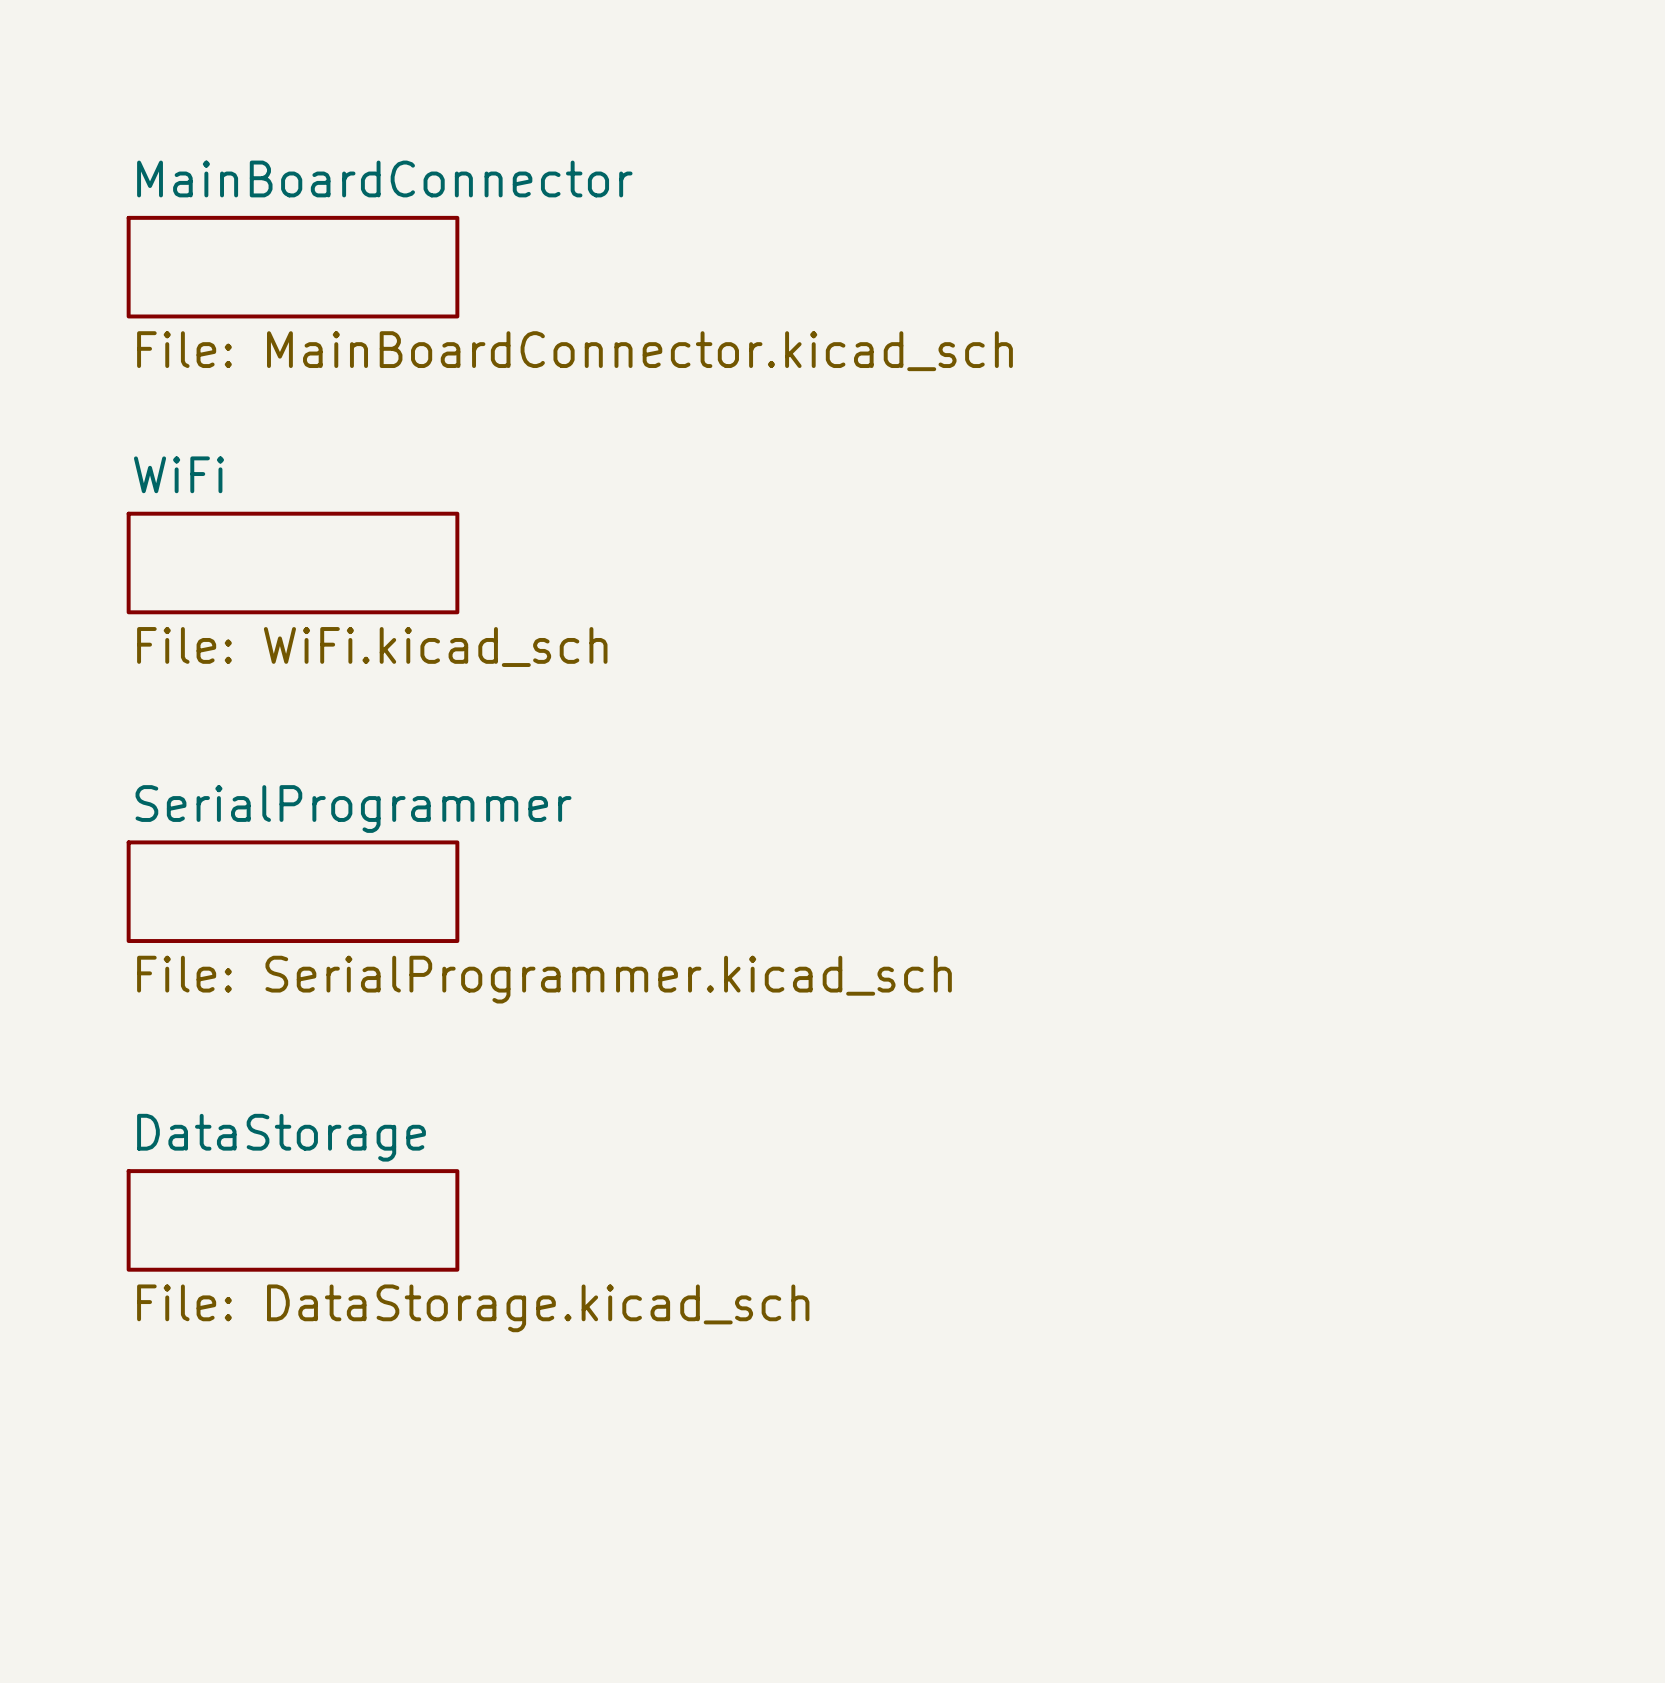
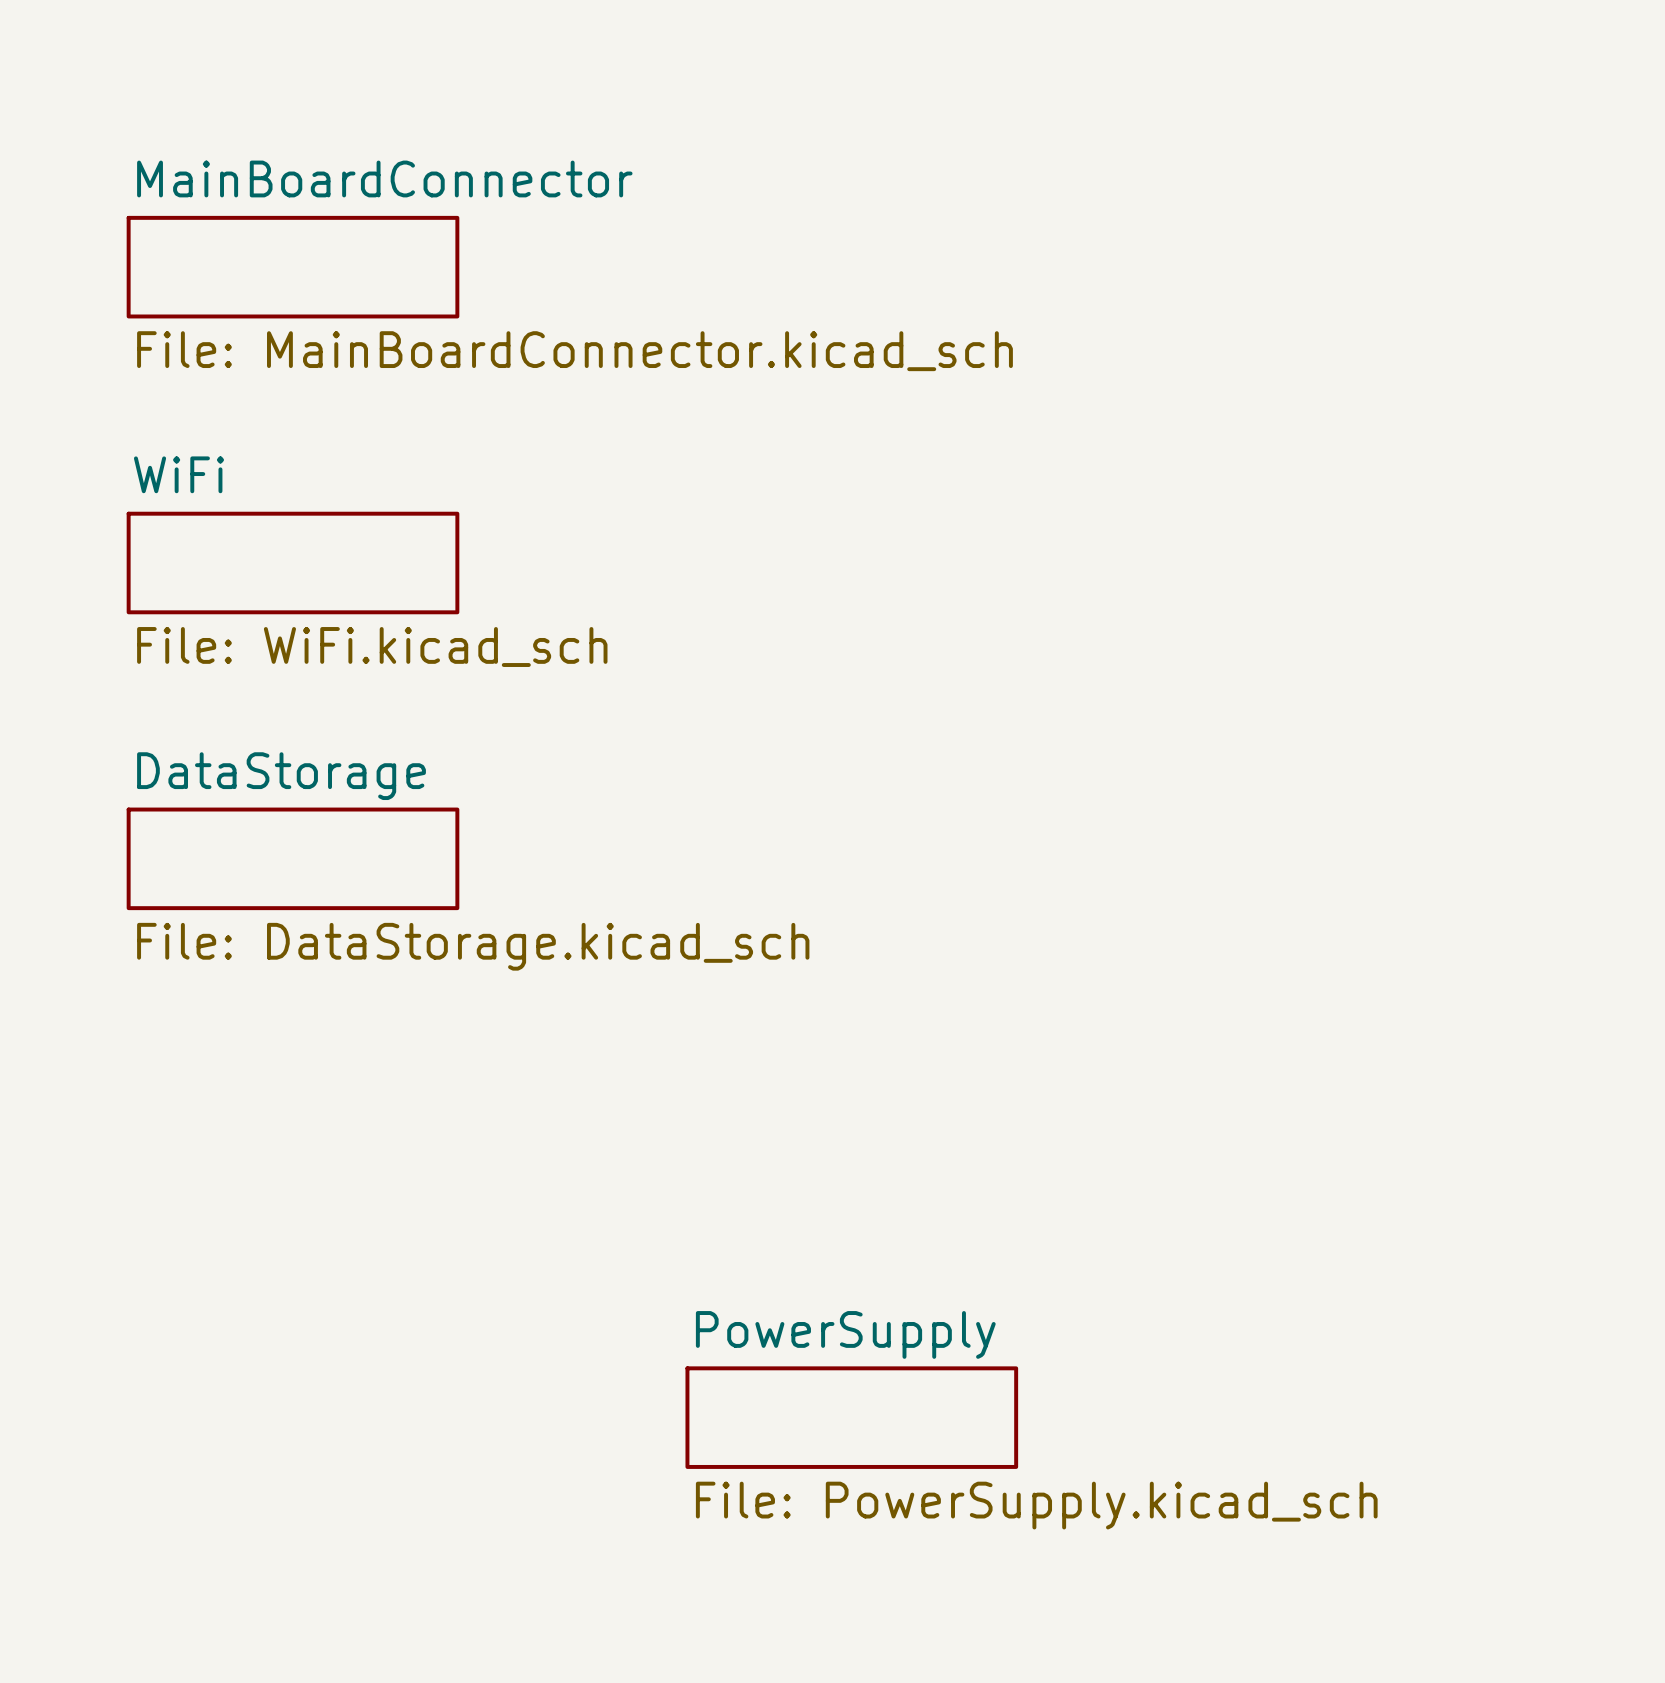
sheet SerialProgrammer: File: SerialProgrammer.kicad_sch (293, 891) -> none
sheet DataStorage position: (293, 1220) -> (293, 858)
sheet PowerSupply: none -> File: PowerSupply.kicad_sch (851, 1417)

